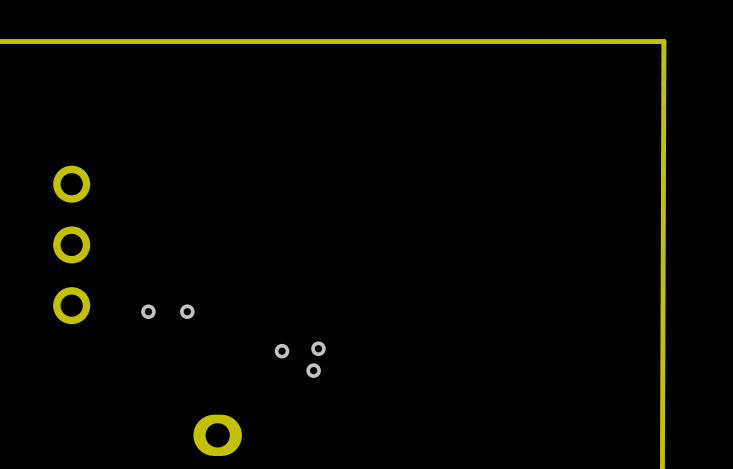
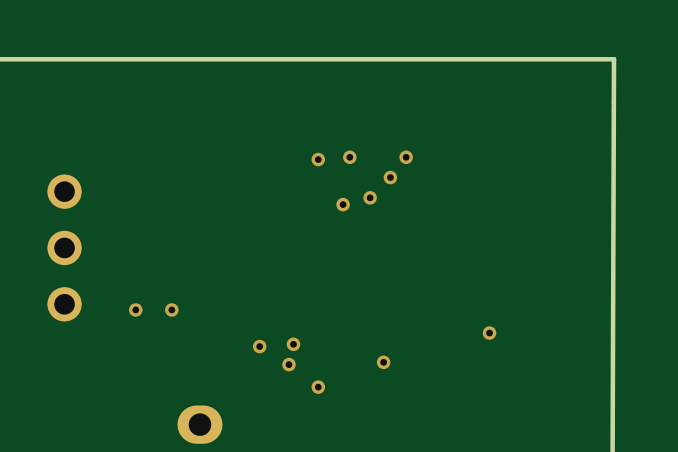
via: none -> (349, 157)
via: none -> (406, 157)
via: none -> (318, 159)
via: none -> (390, 177)
via: none -> (370, 197)
via: none -> (343, 204)
via: none -> (489, 333)
via: none -> (383, 362)
via: none -> (318, 387)

